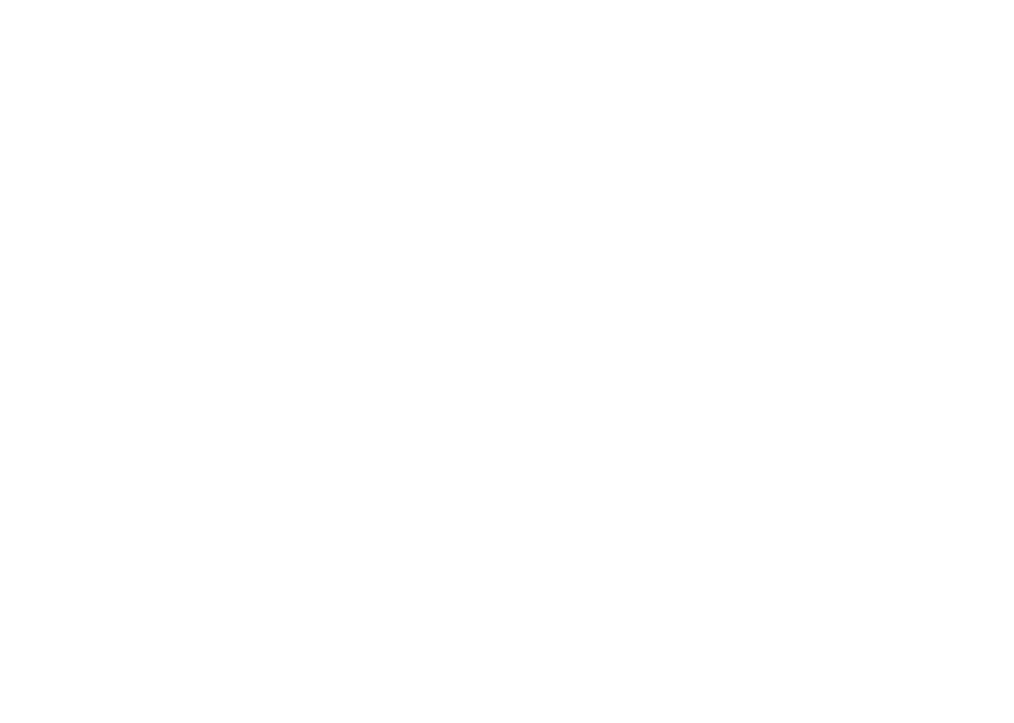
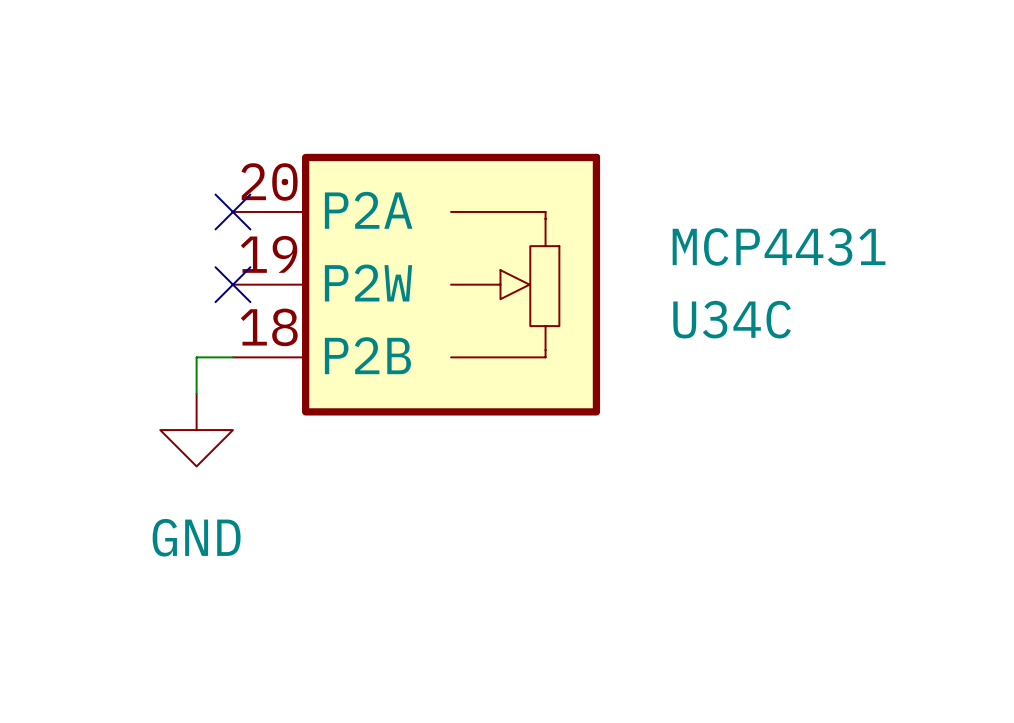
no-connect mark: none -> (232, 211)
no-connect mark: none -> (232, 284)
U34C: none -> MCP4431 (416, 284)
wire: none -> (232, 357) (196, 357) (196, 393)
power symbol: none -> GND (196, 430)

